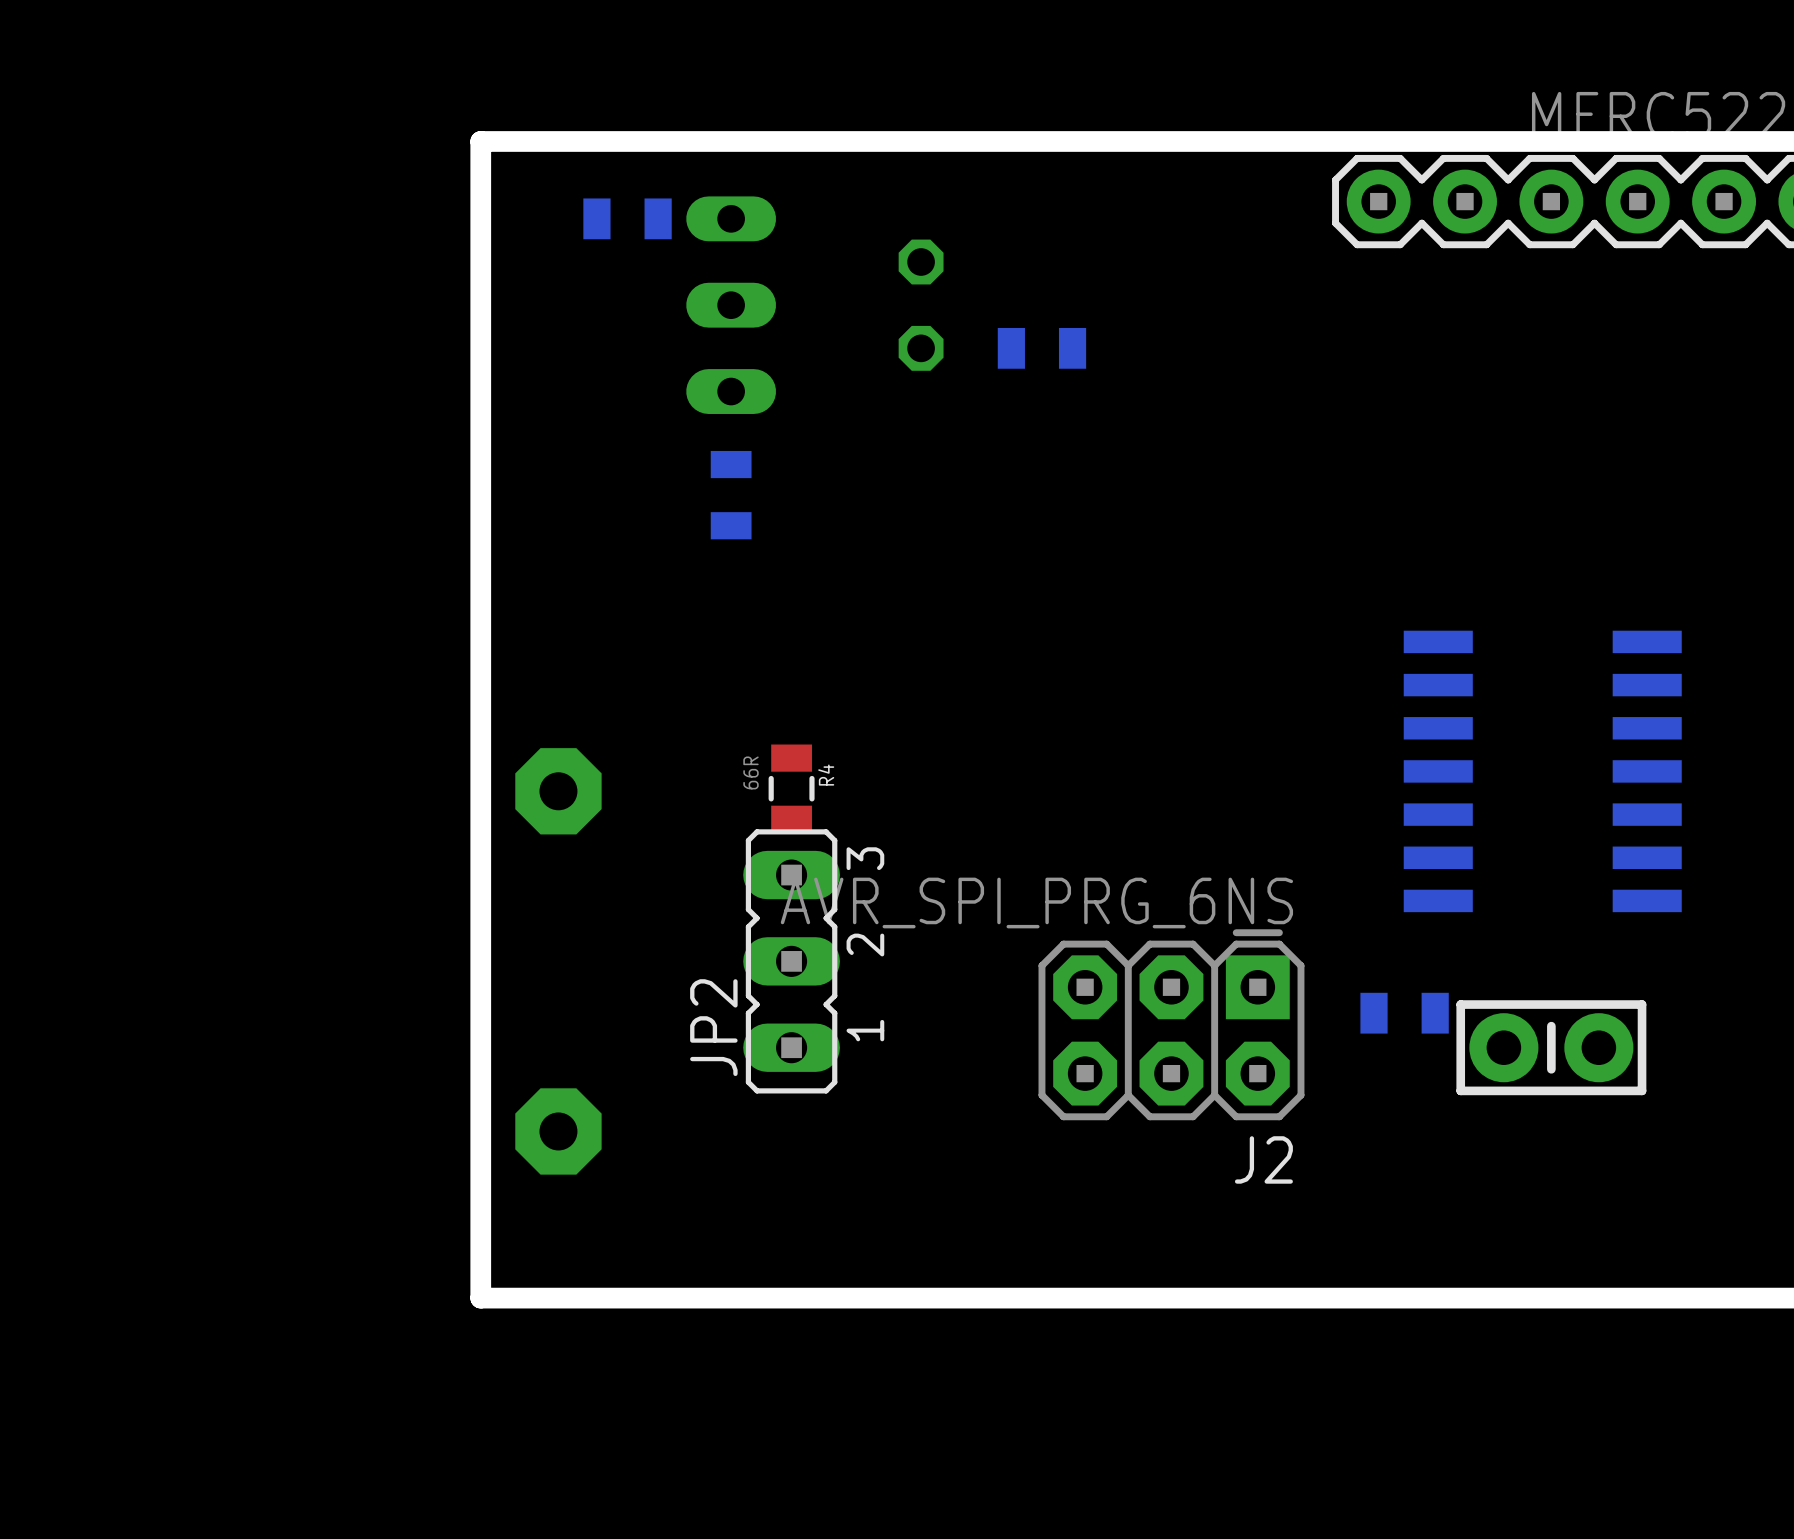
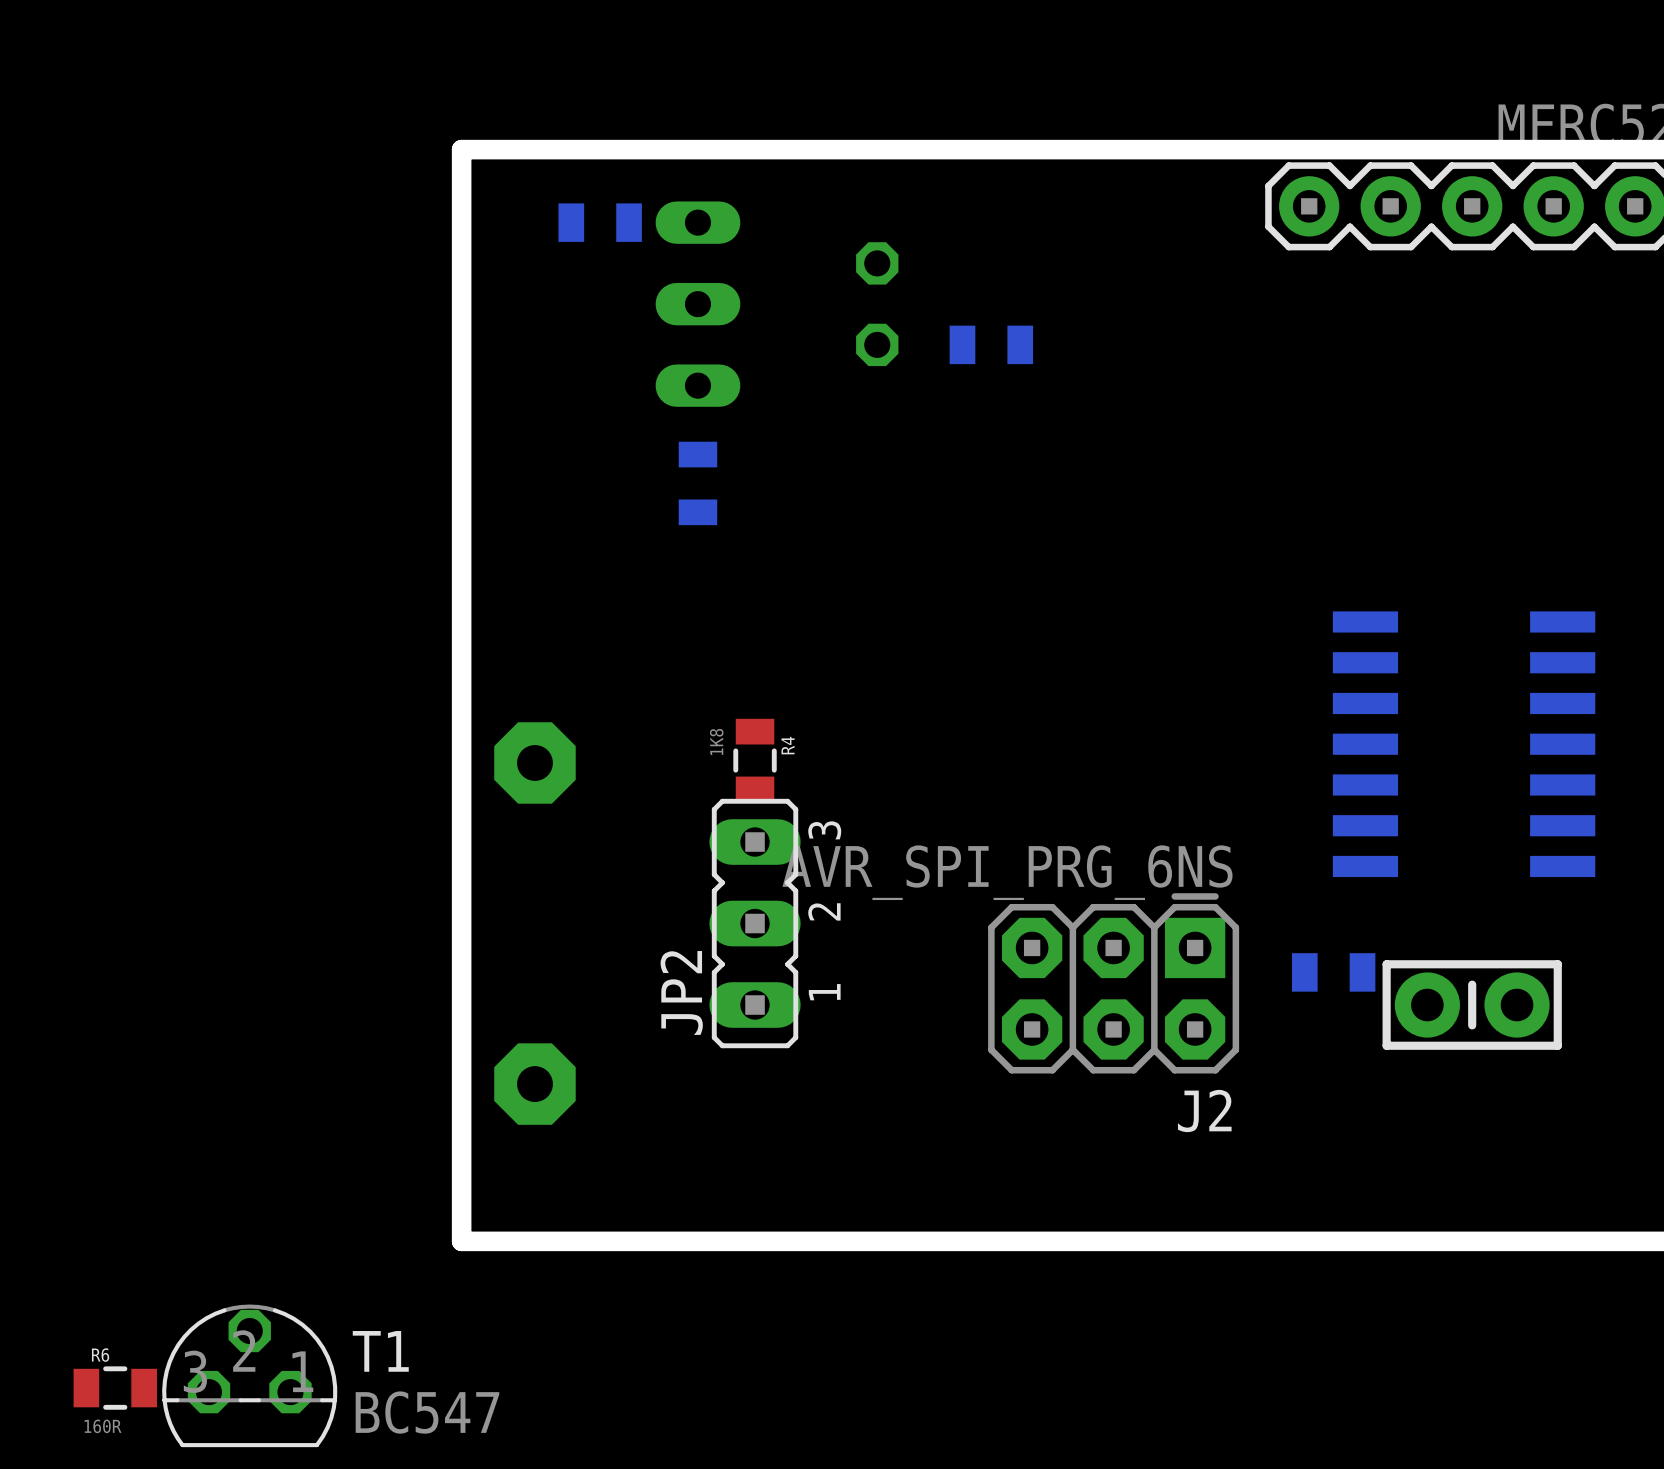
R4 value: 66R (751, 772) -> 1K8 (716, 742)
T1: none -> BC547 (249, 1375)
R6: none -> 160R (115, 1388)

